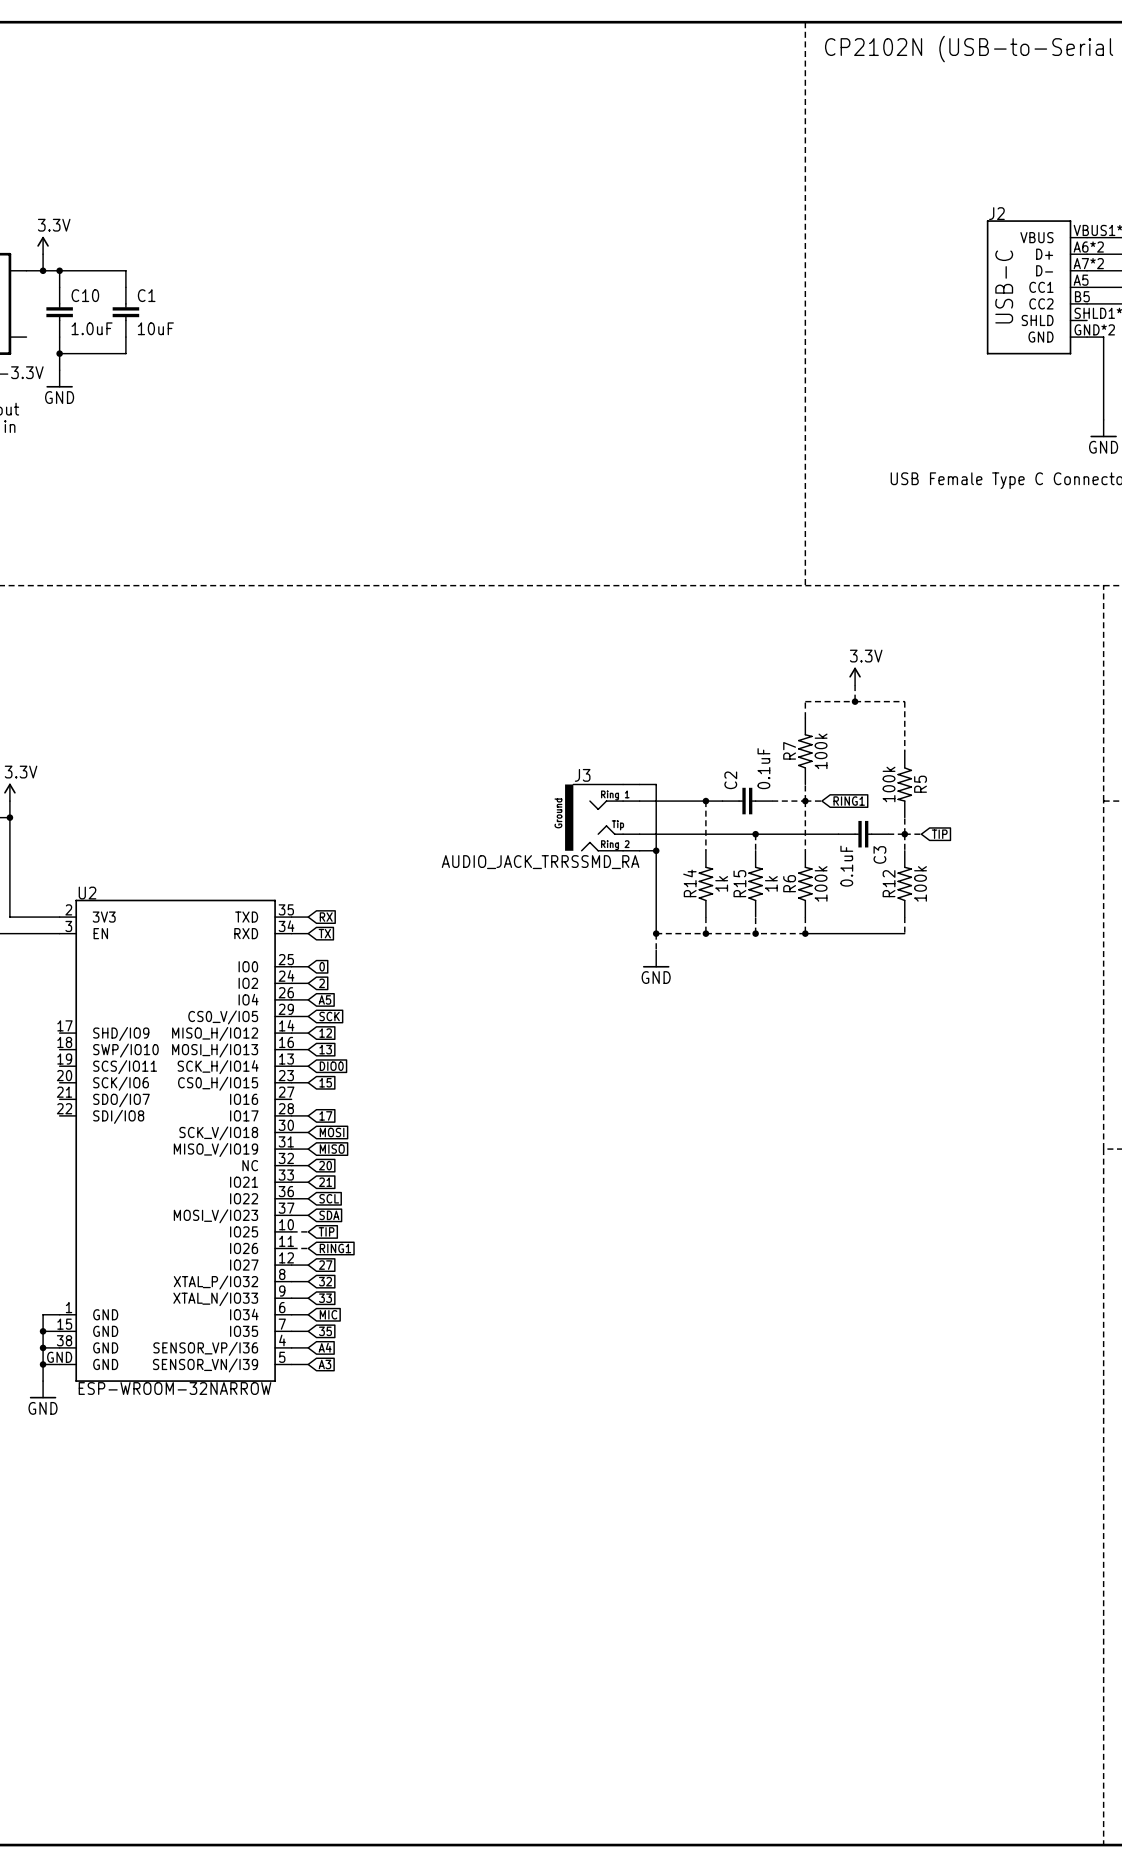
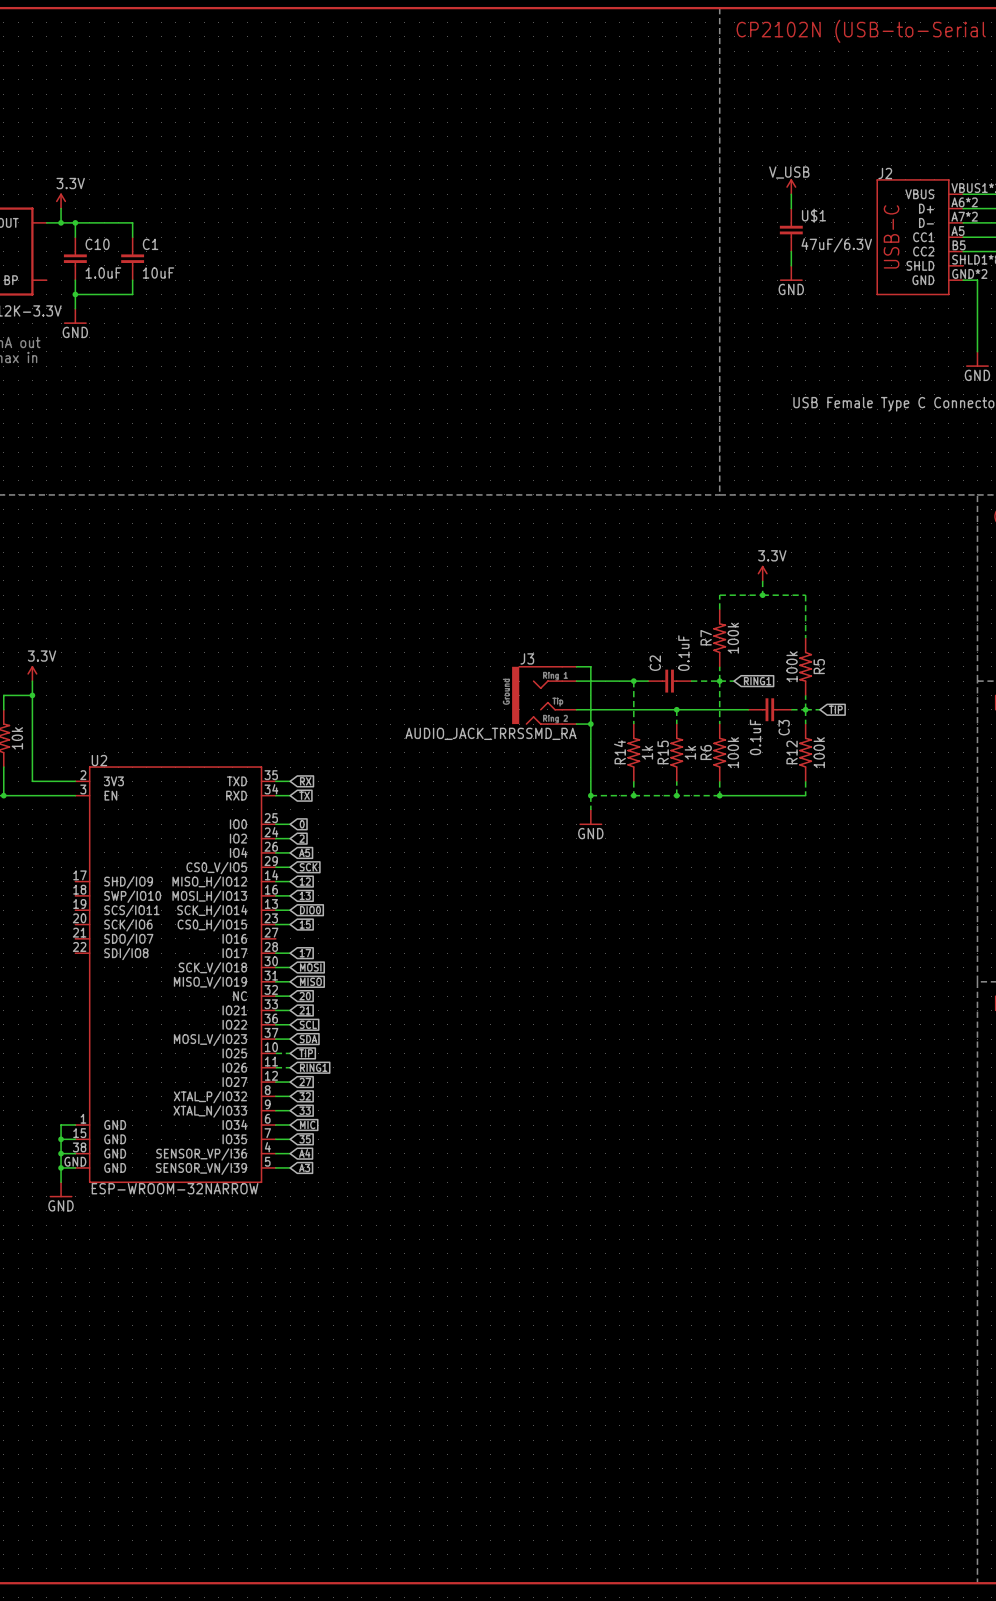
power symbol: none -> V_USB (791, 186)
wire: none -> (791, 194) (791, 208)
U$1: none -> 47uF/6.3V (791, 230)
wire: none -> (791, 251) (791, 265)
power symbol: none -> GND (791, 273)

